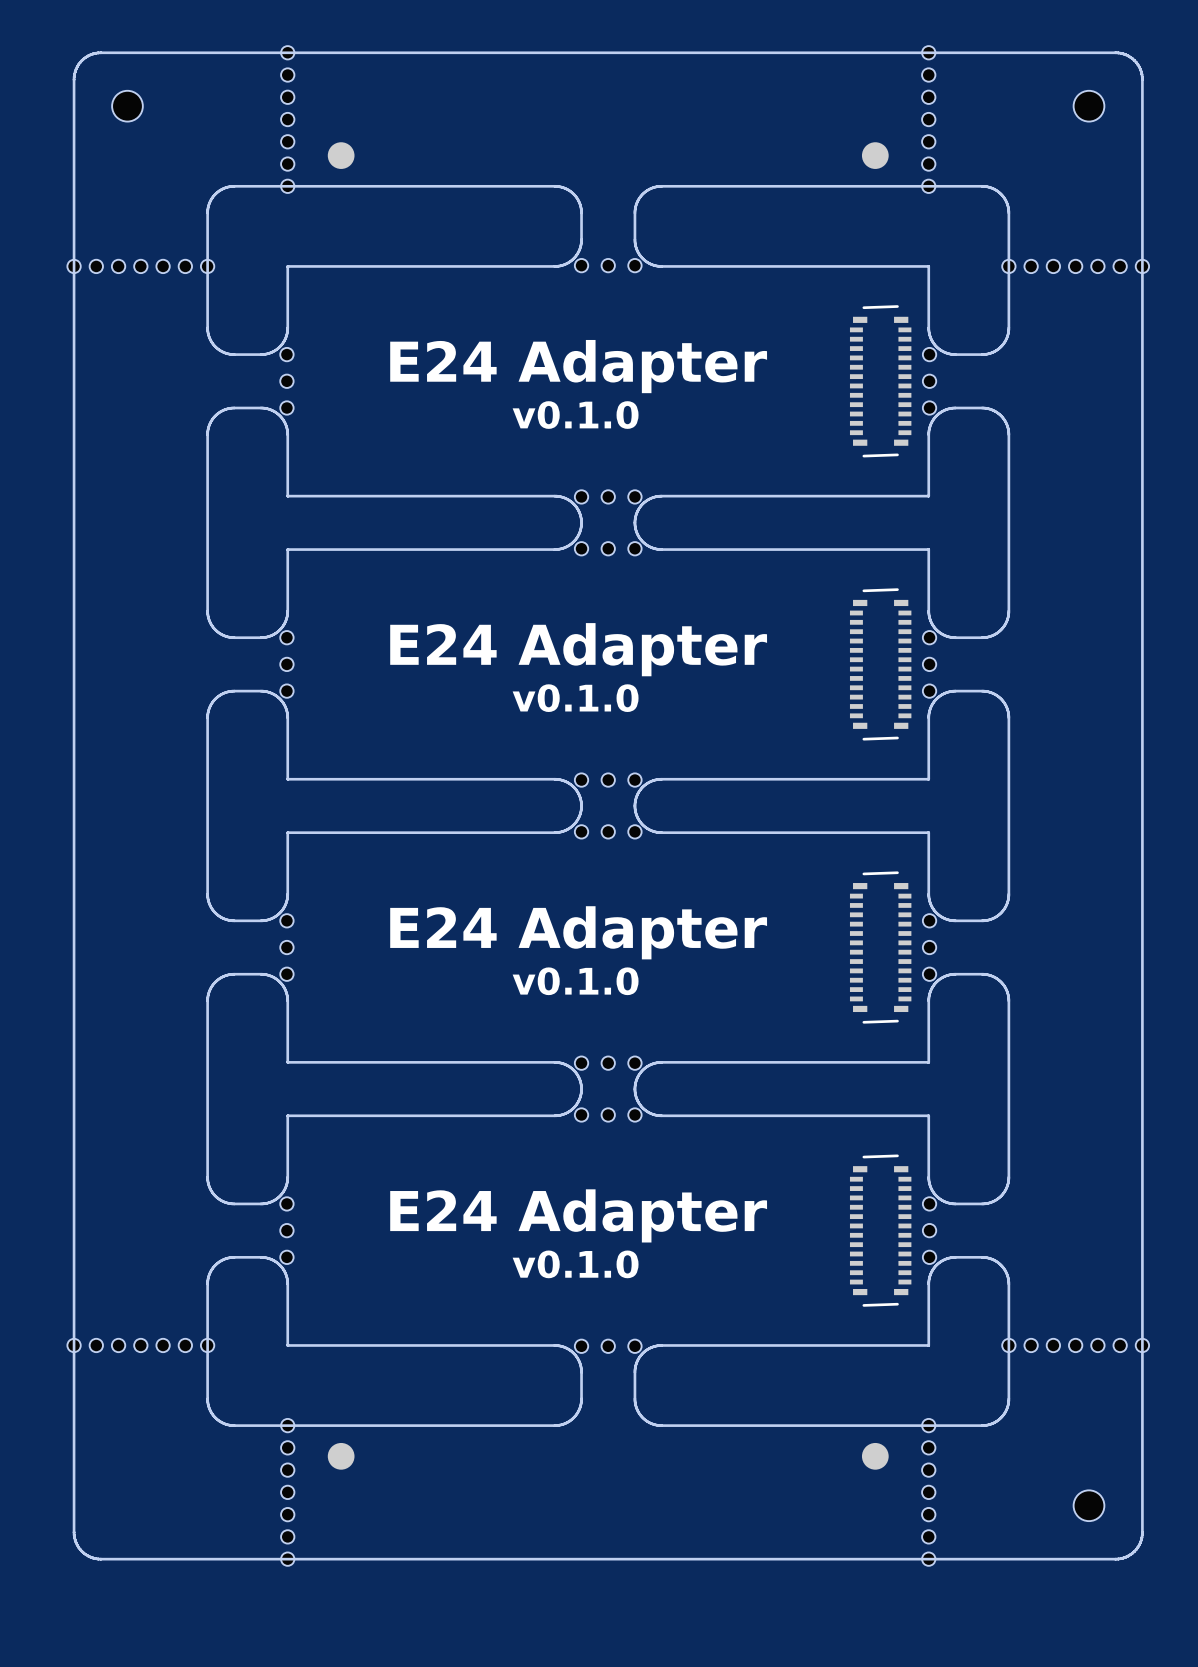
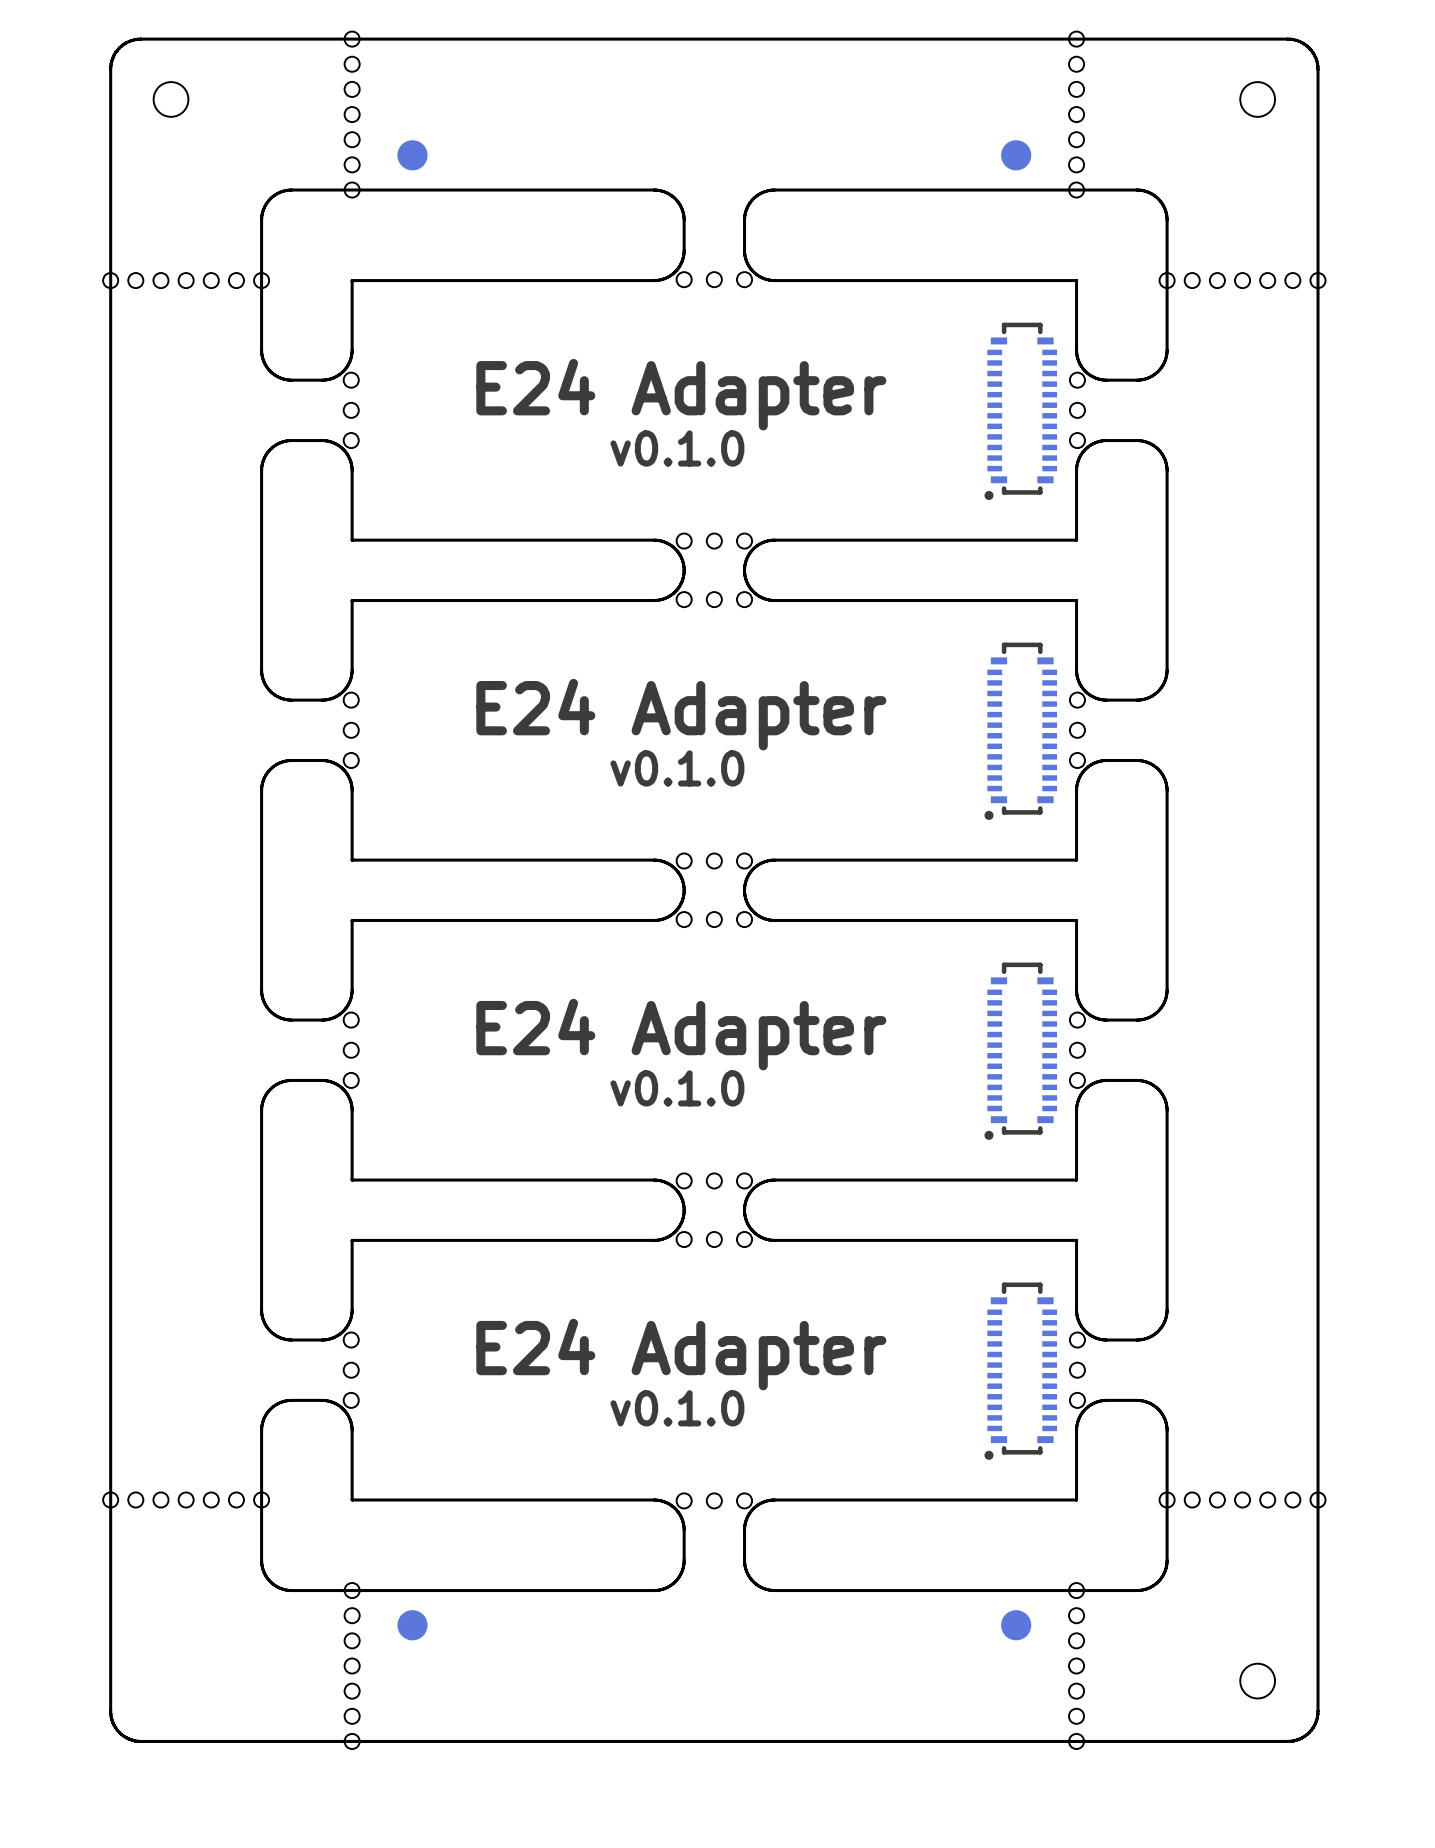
part footprint: [849, 305, 912, 458] -> [984, 322, 1058, 501]
part footprint: [849, 588, 912, 741] -> [984, 642, 1058, 820]
part footprint: [849, 871, 912, 1024] -> [984, 962, 1058, 1140]
part footprint: [849, 1154, 912, 1307] -> [984, 1282, 1058, 1460]

